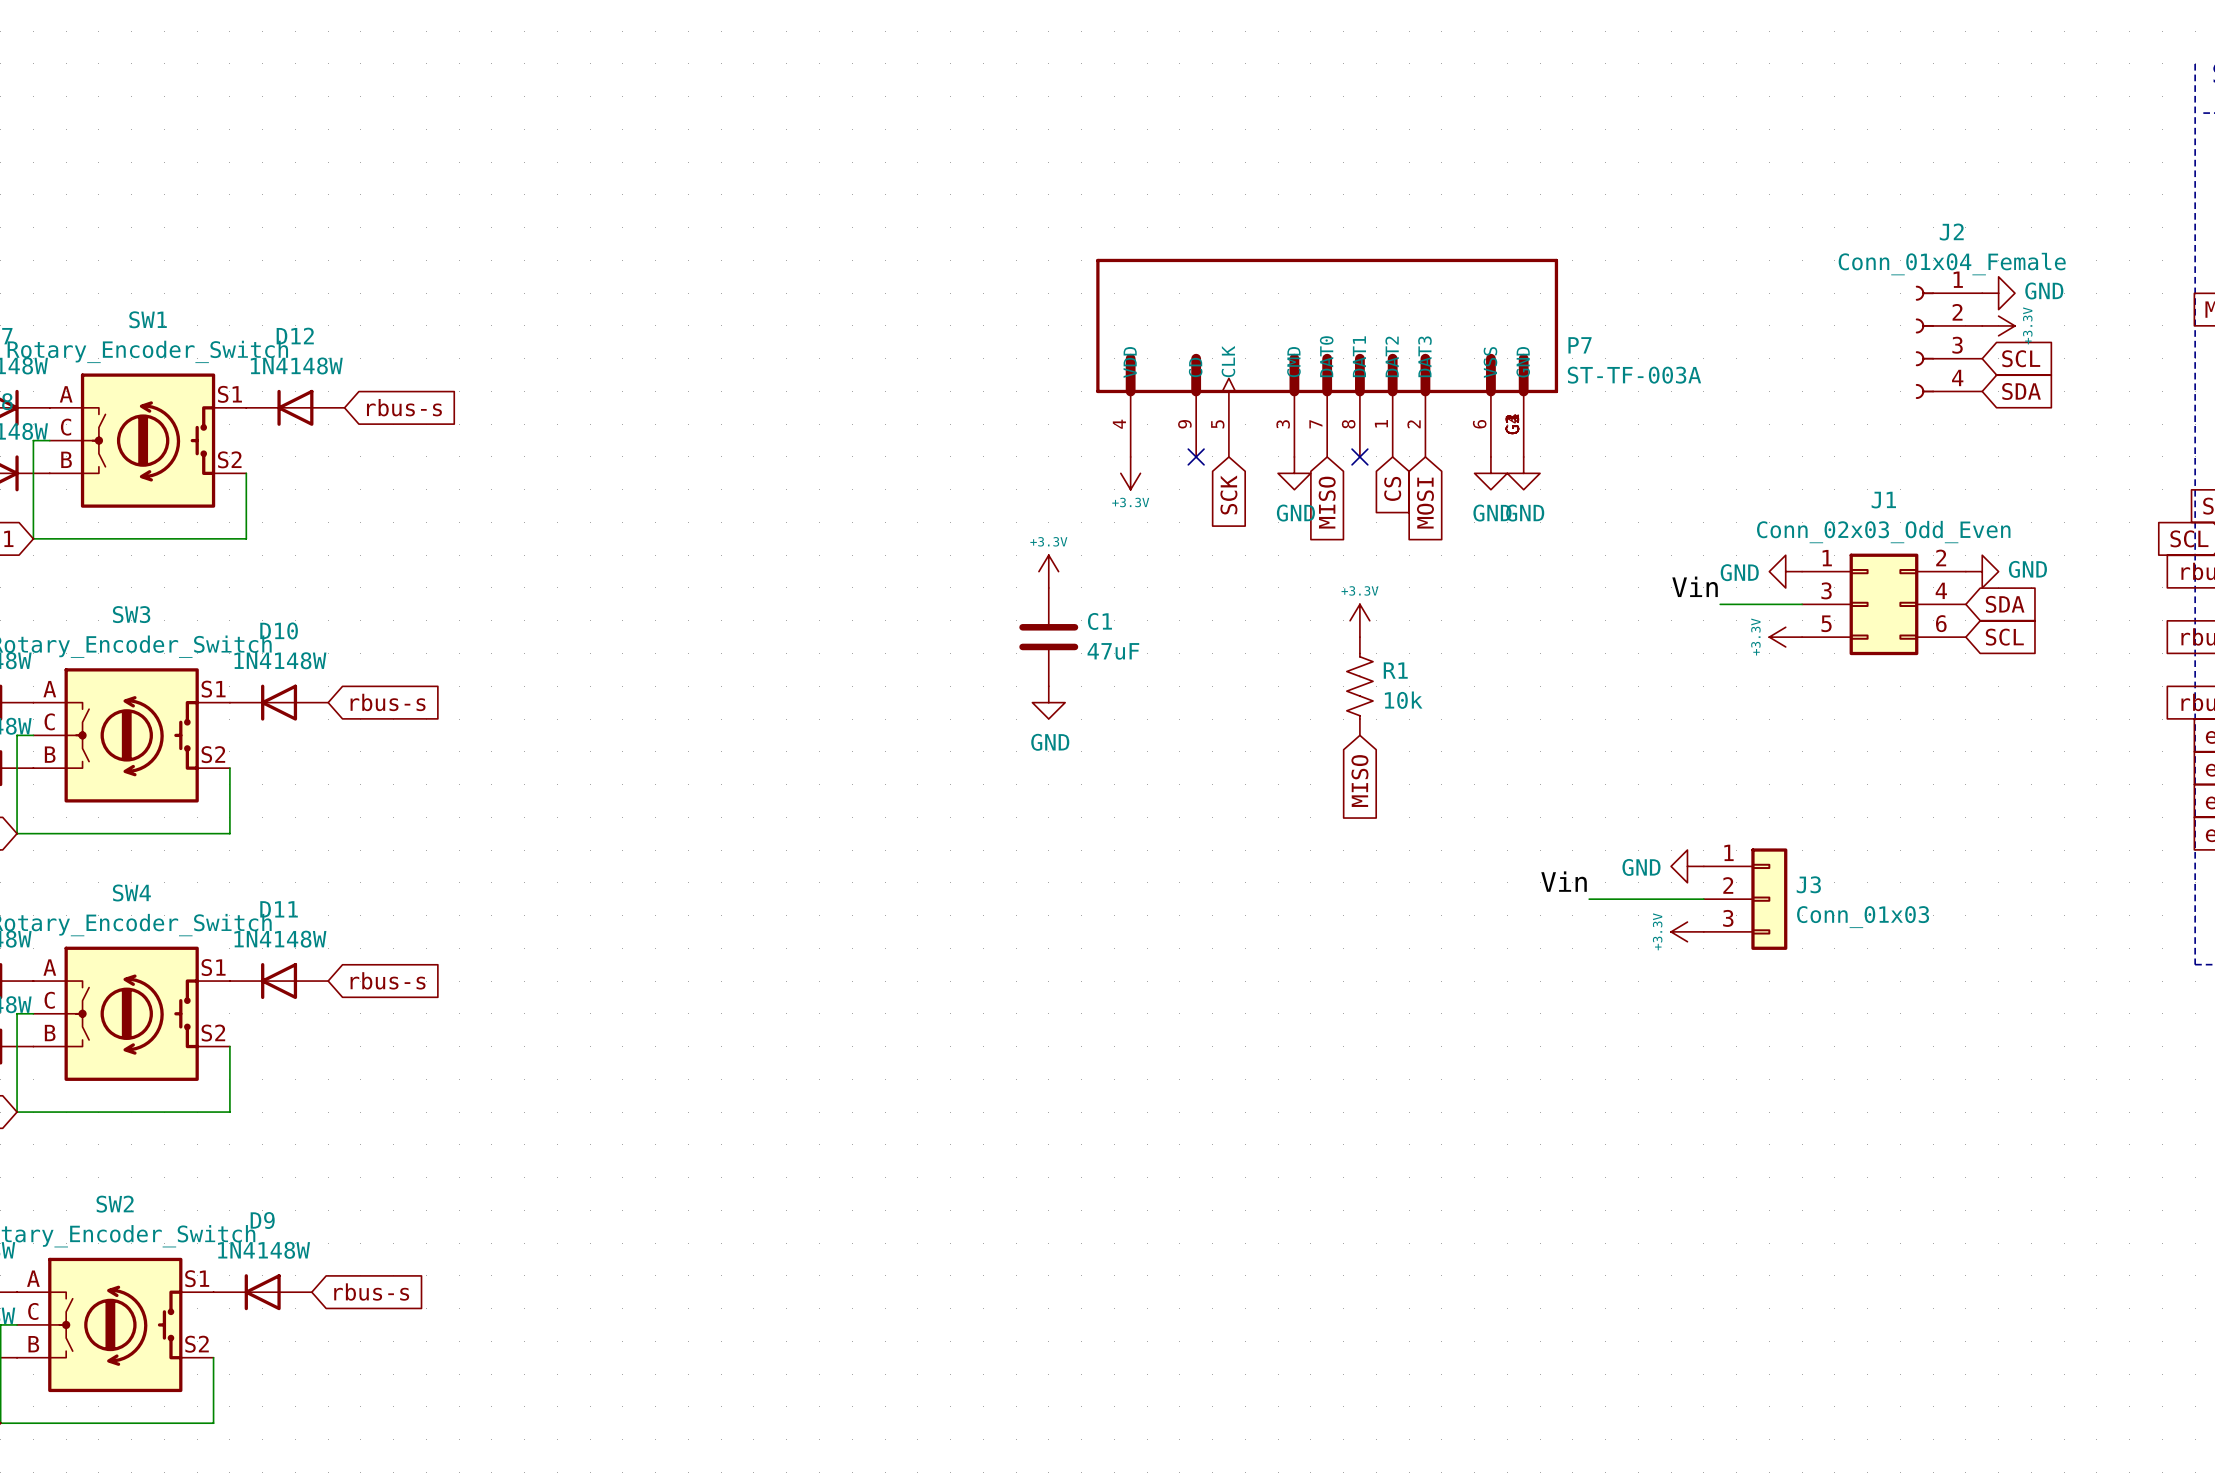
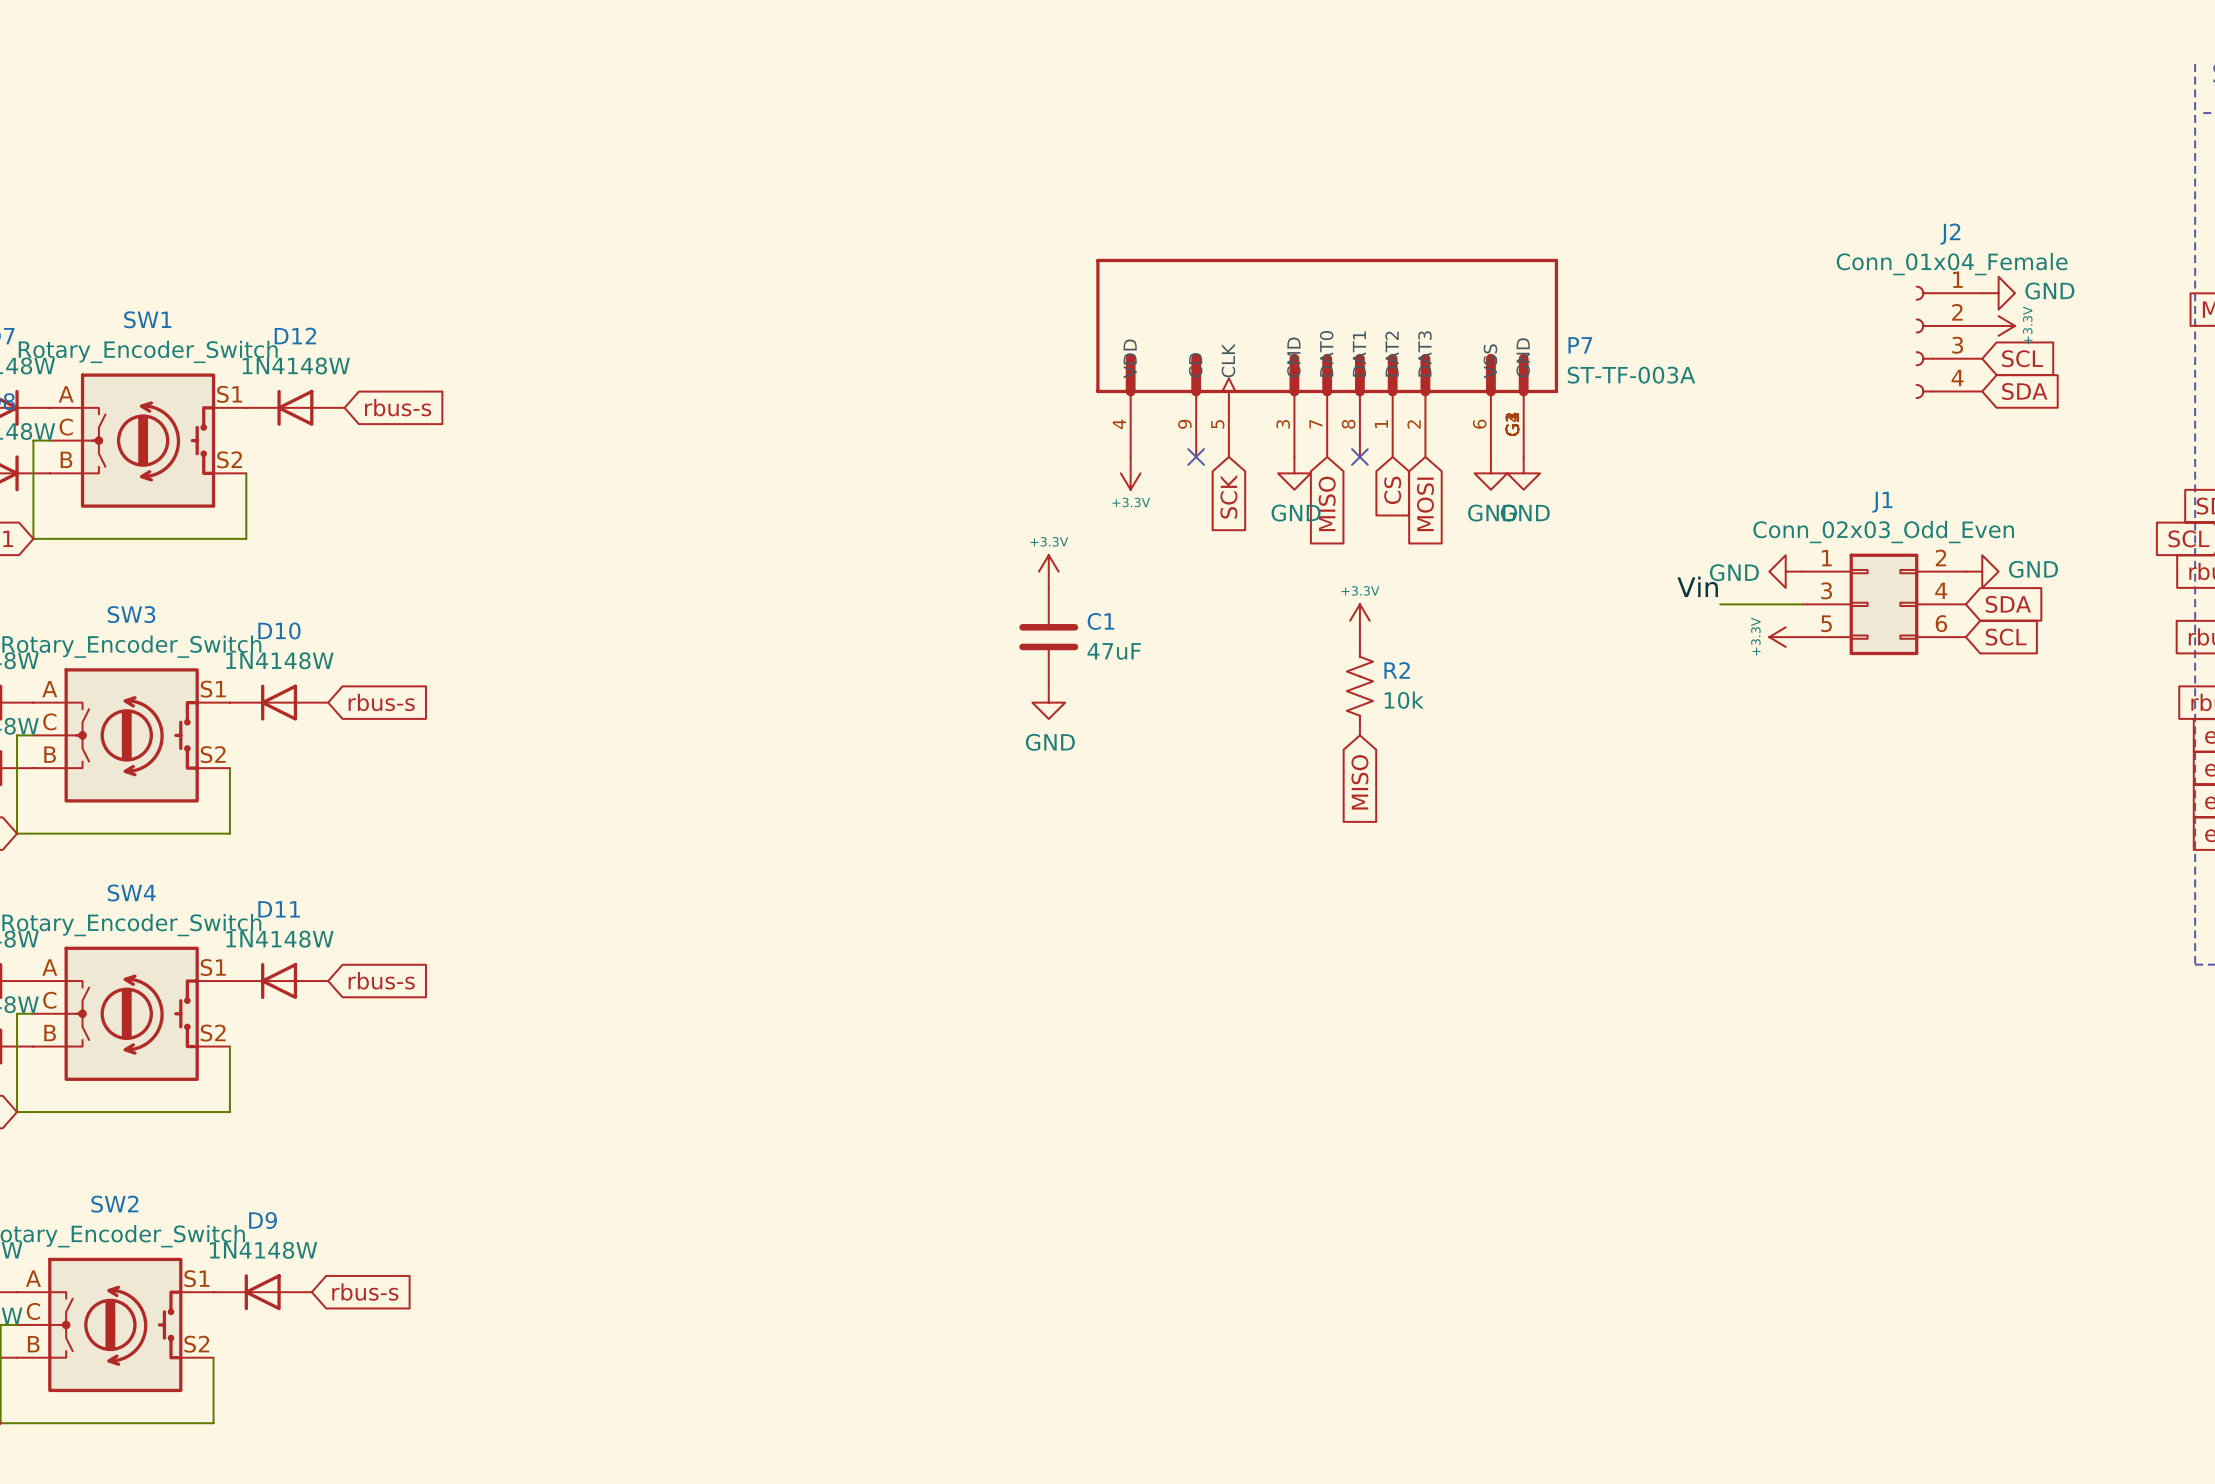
R1 name: R1 (1395, 670) -> R2 (1397, 670)
power symbol: GND (1687, 866) -> none
label: Vin (1564, 881) -> none
wire: (1589, 899) (1703, 899) -> none
J3: Conn_01x03 (1745, 899) -> none
power symbol: +3.3V (1687, 931) -> none

